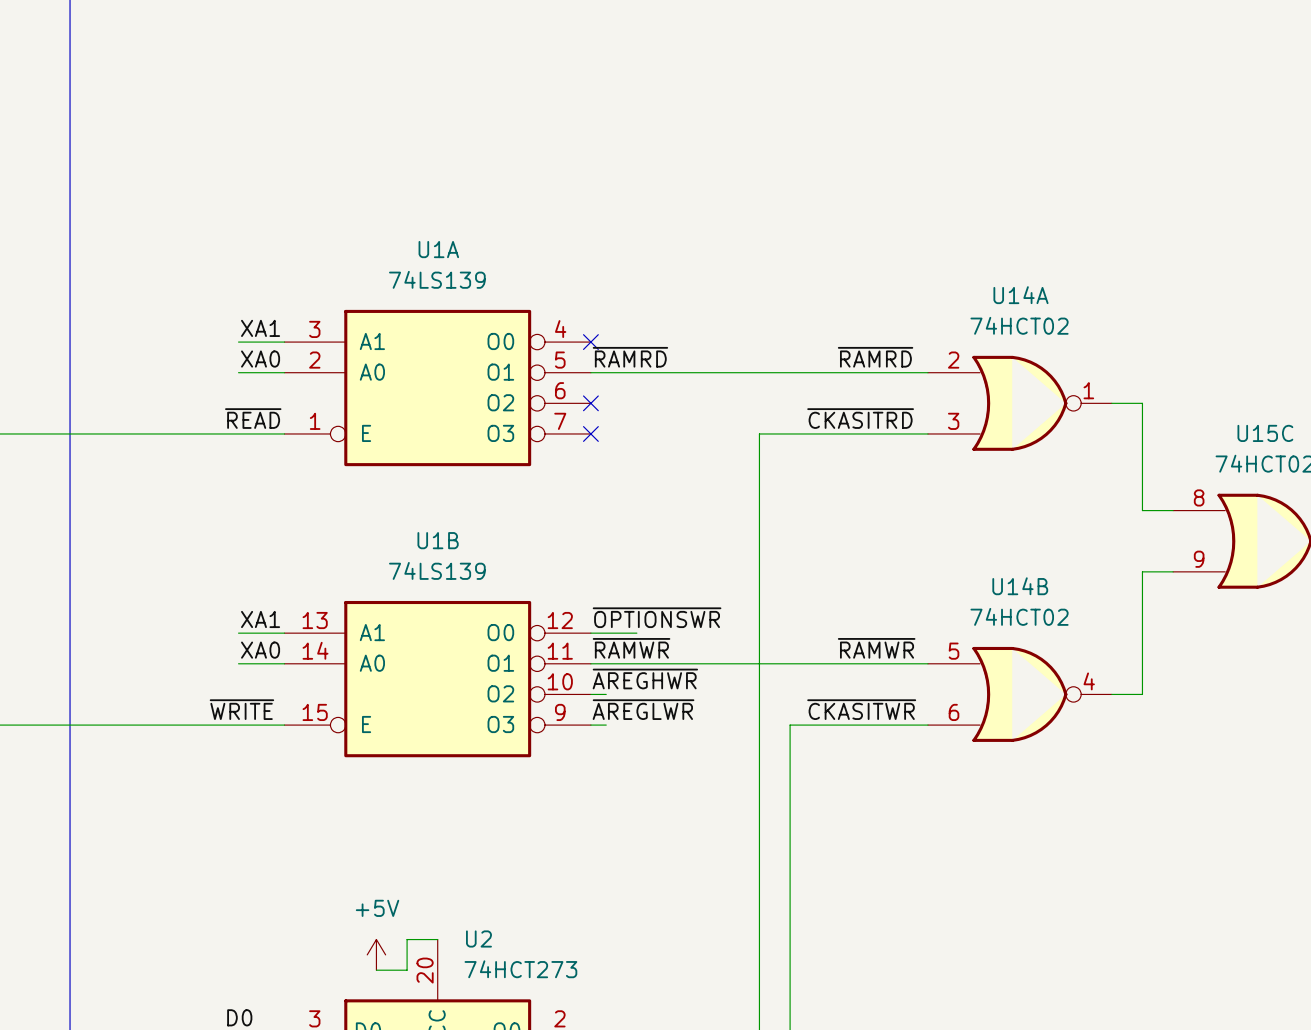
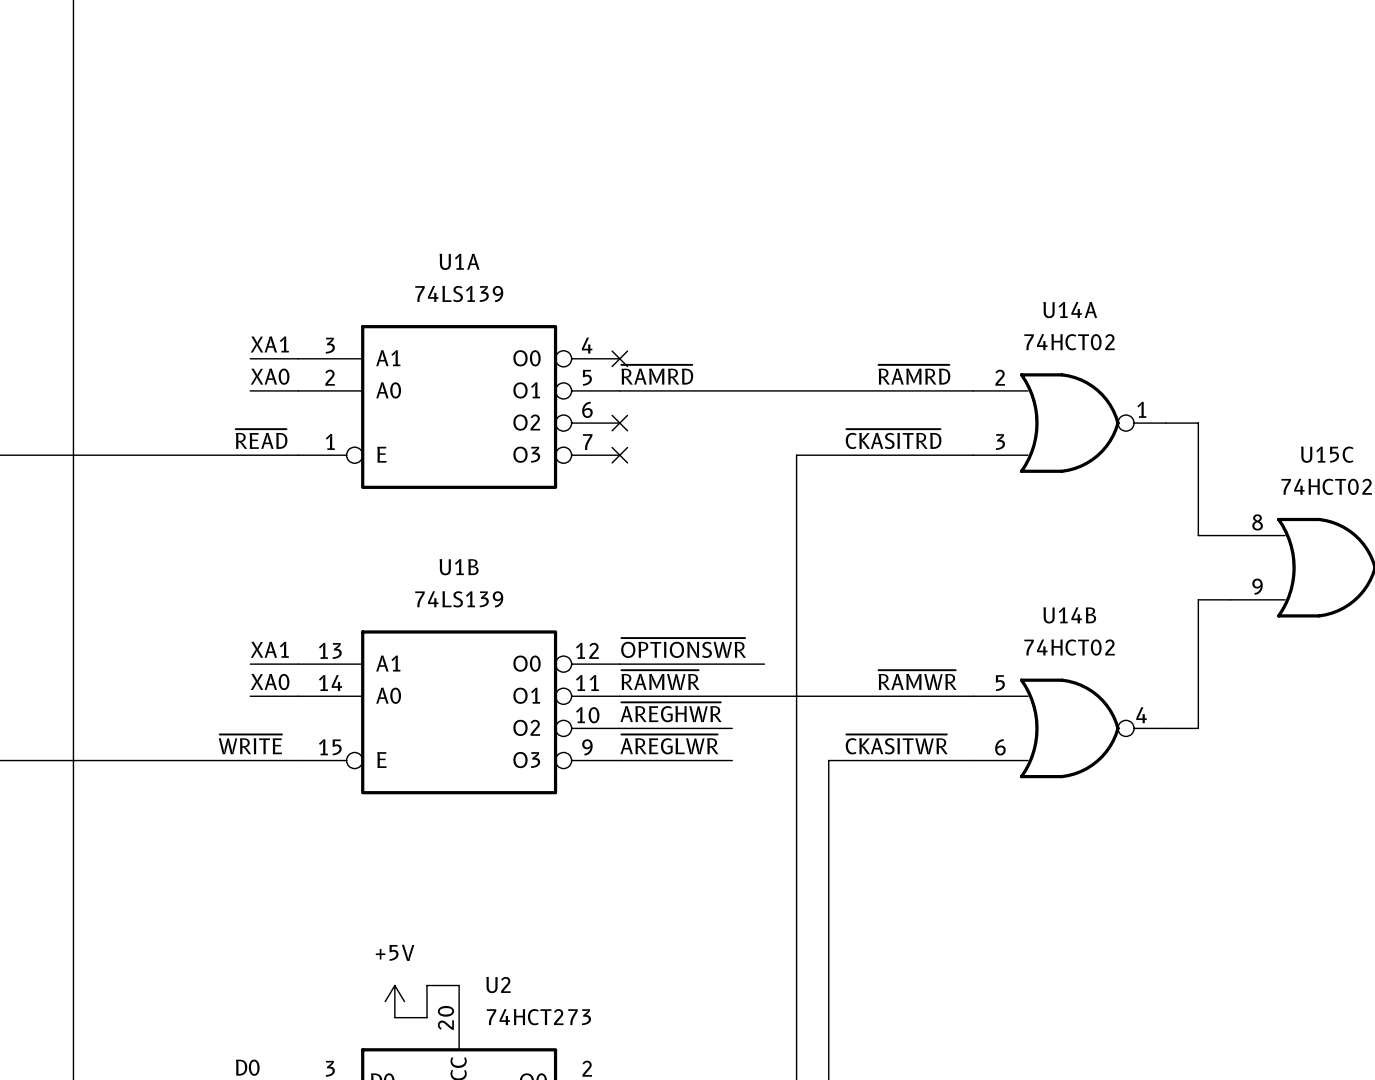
wire: none -> (668, 664) (764, 664)
wire: none -> (635, 728) (732, 728)
wire: none -> (635, 760) (732, 760)

